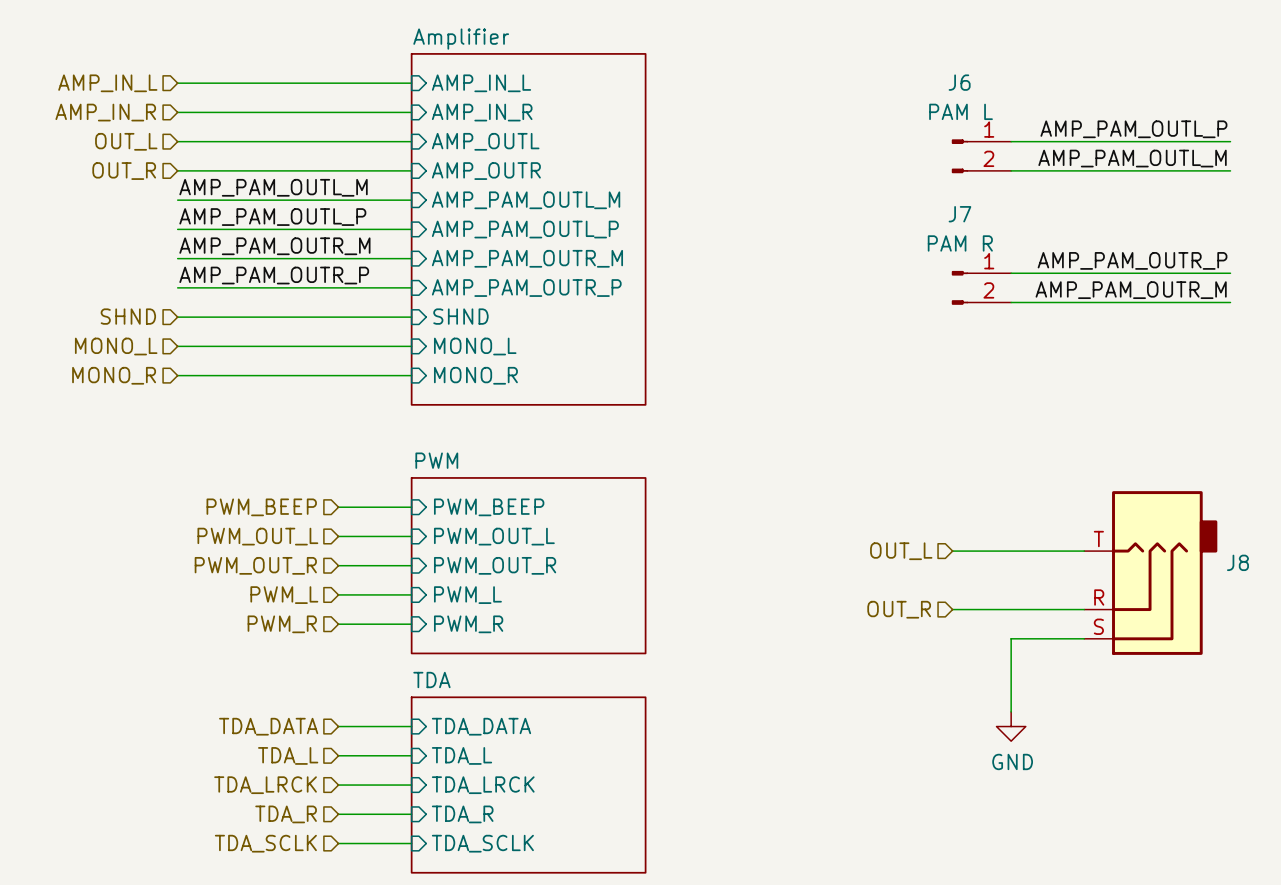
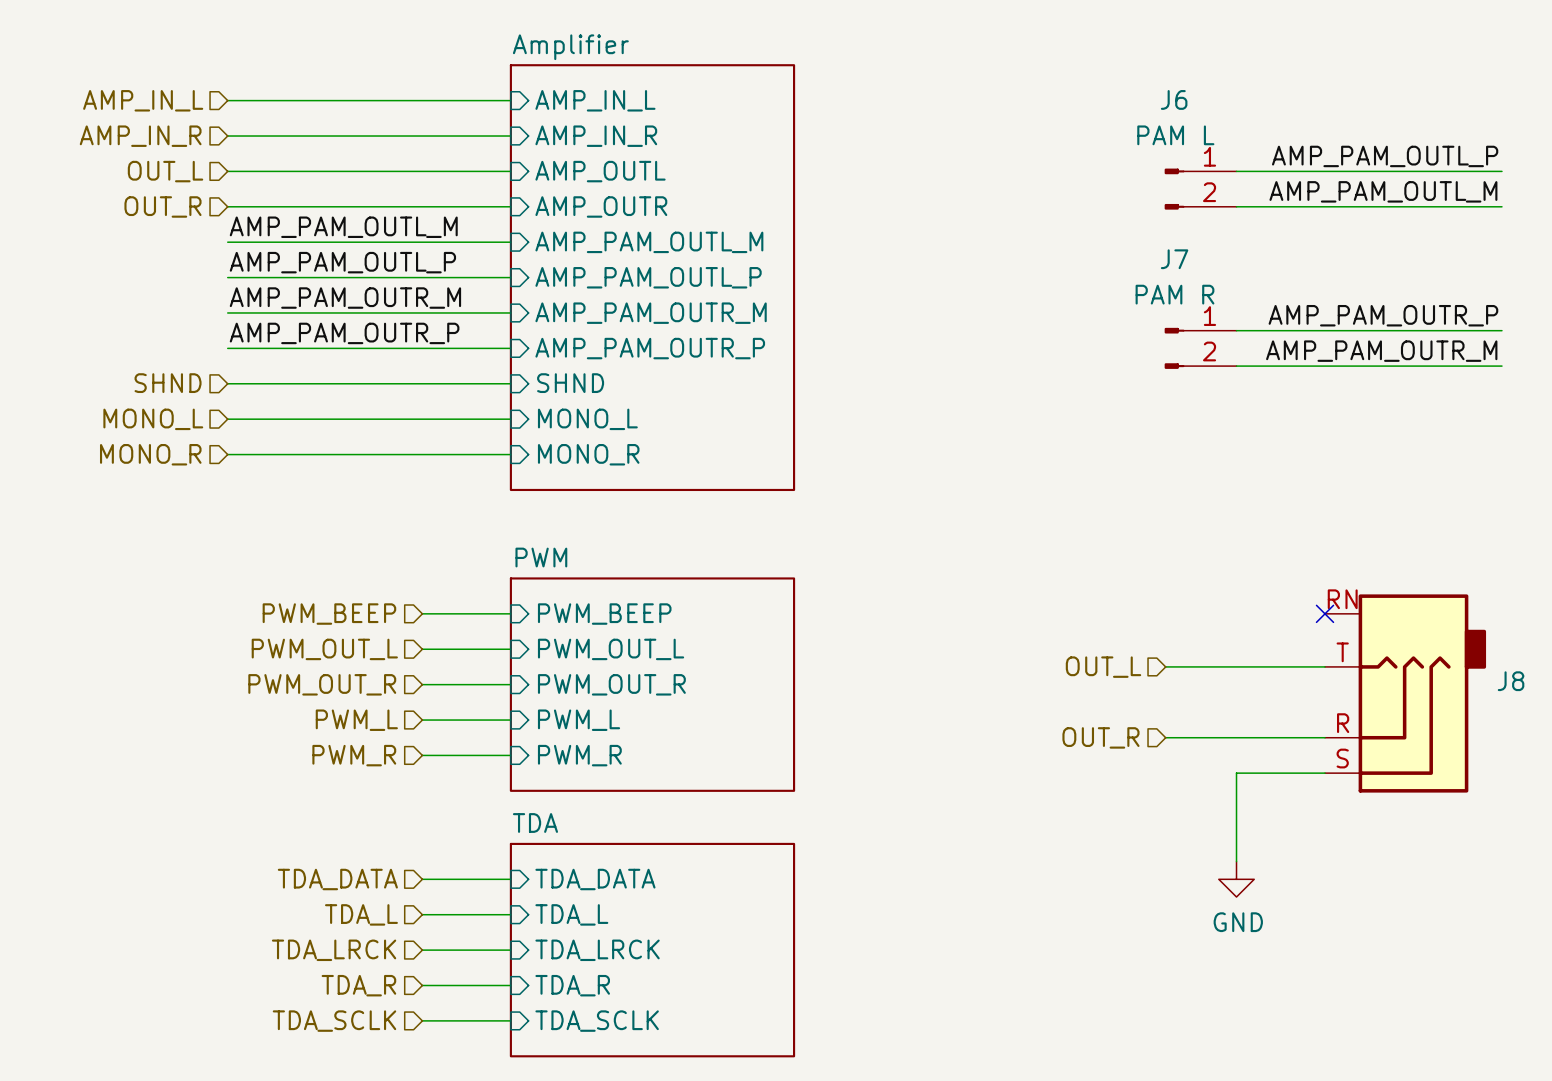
J8 symbol: [1084, 491, 1218, 655] -> [1325, 594, 1487, 793]
no-connect mark: none -> (1325, 613)

